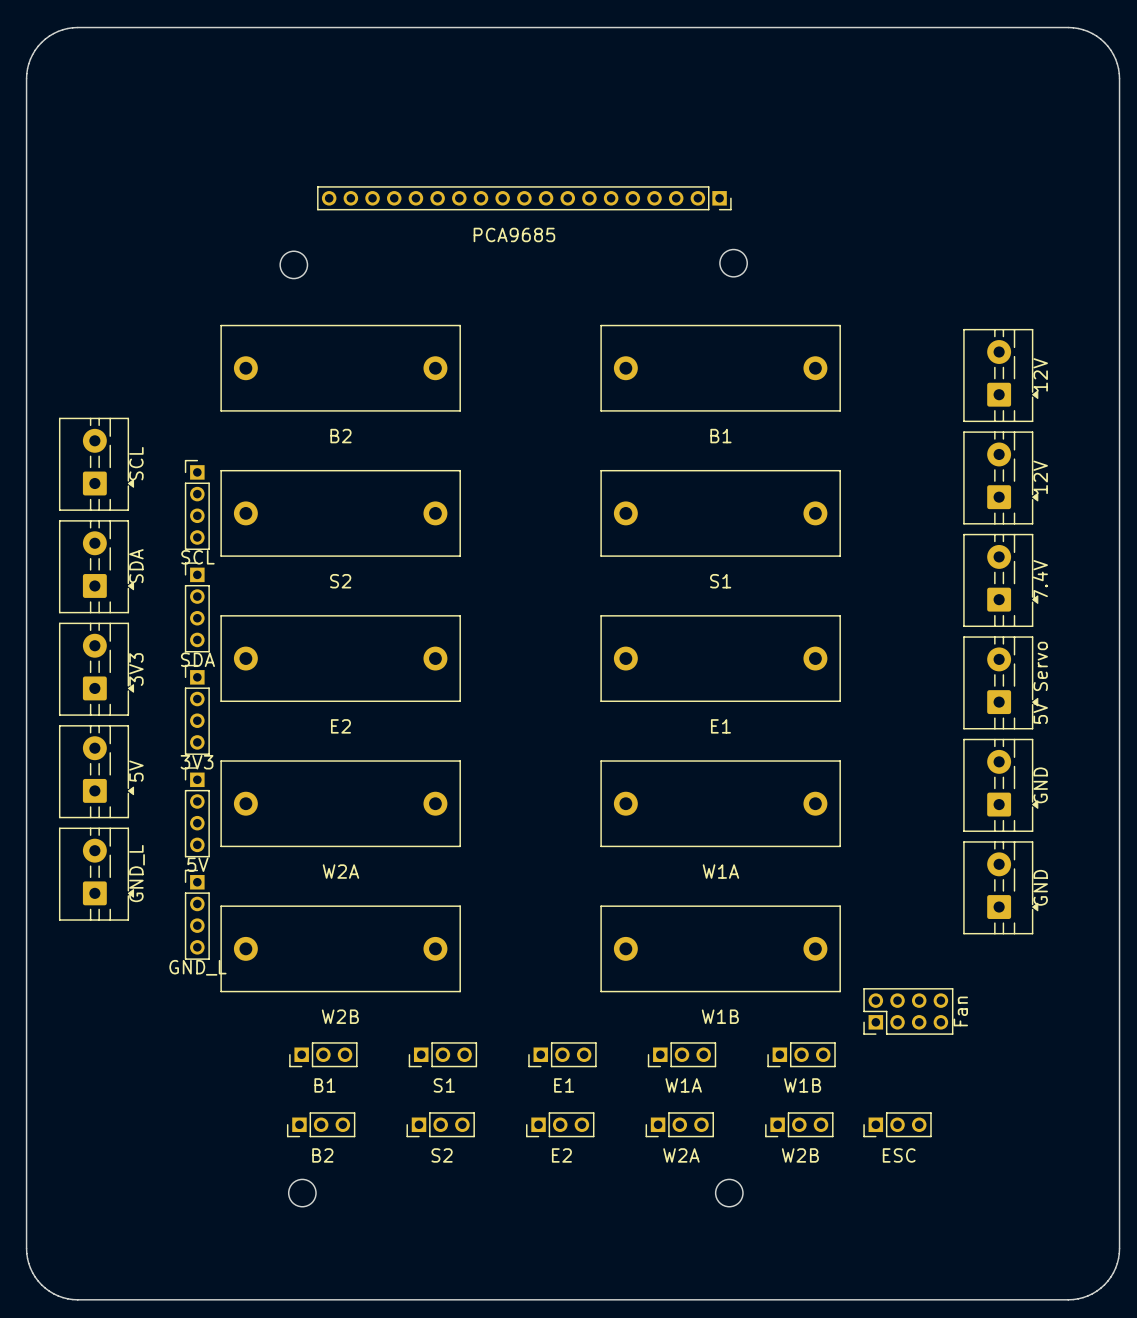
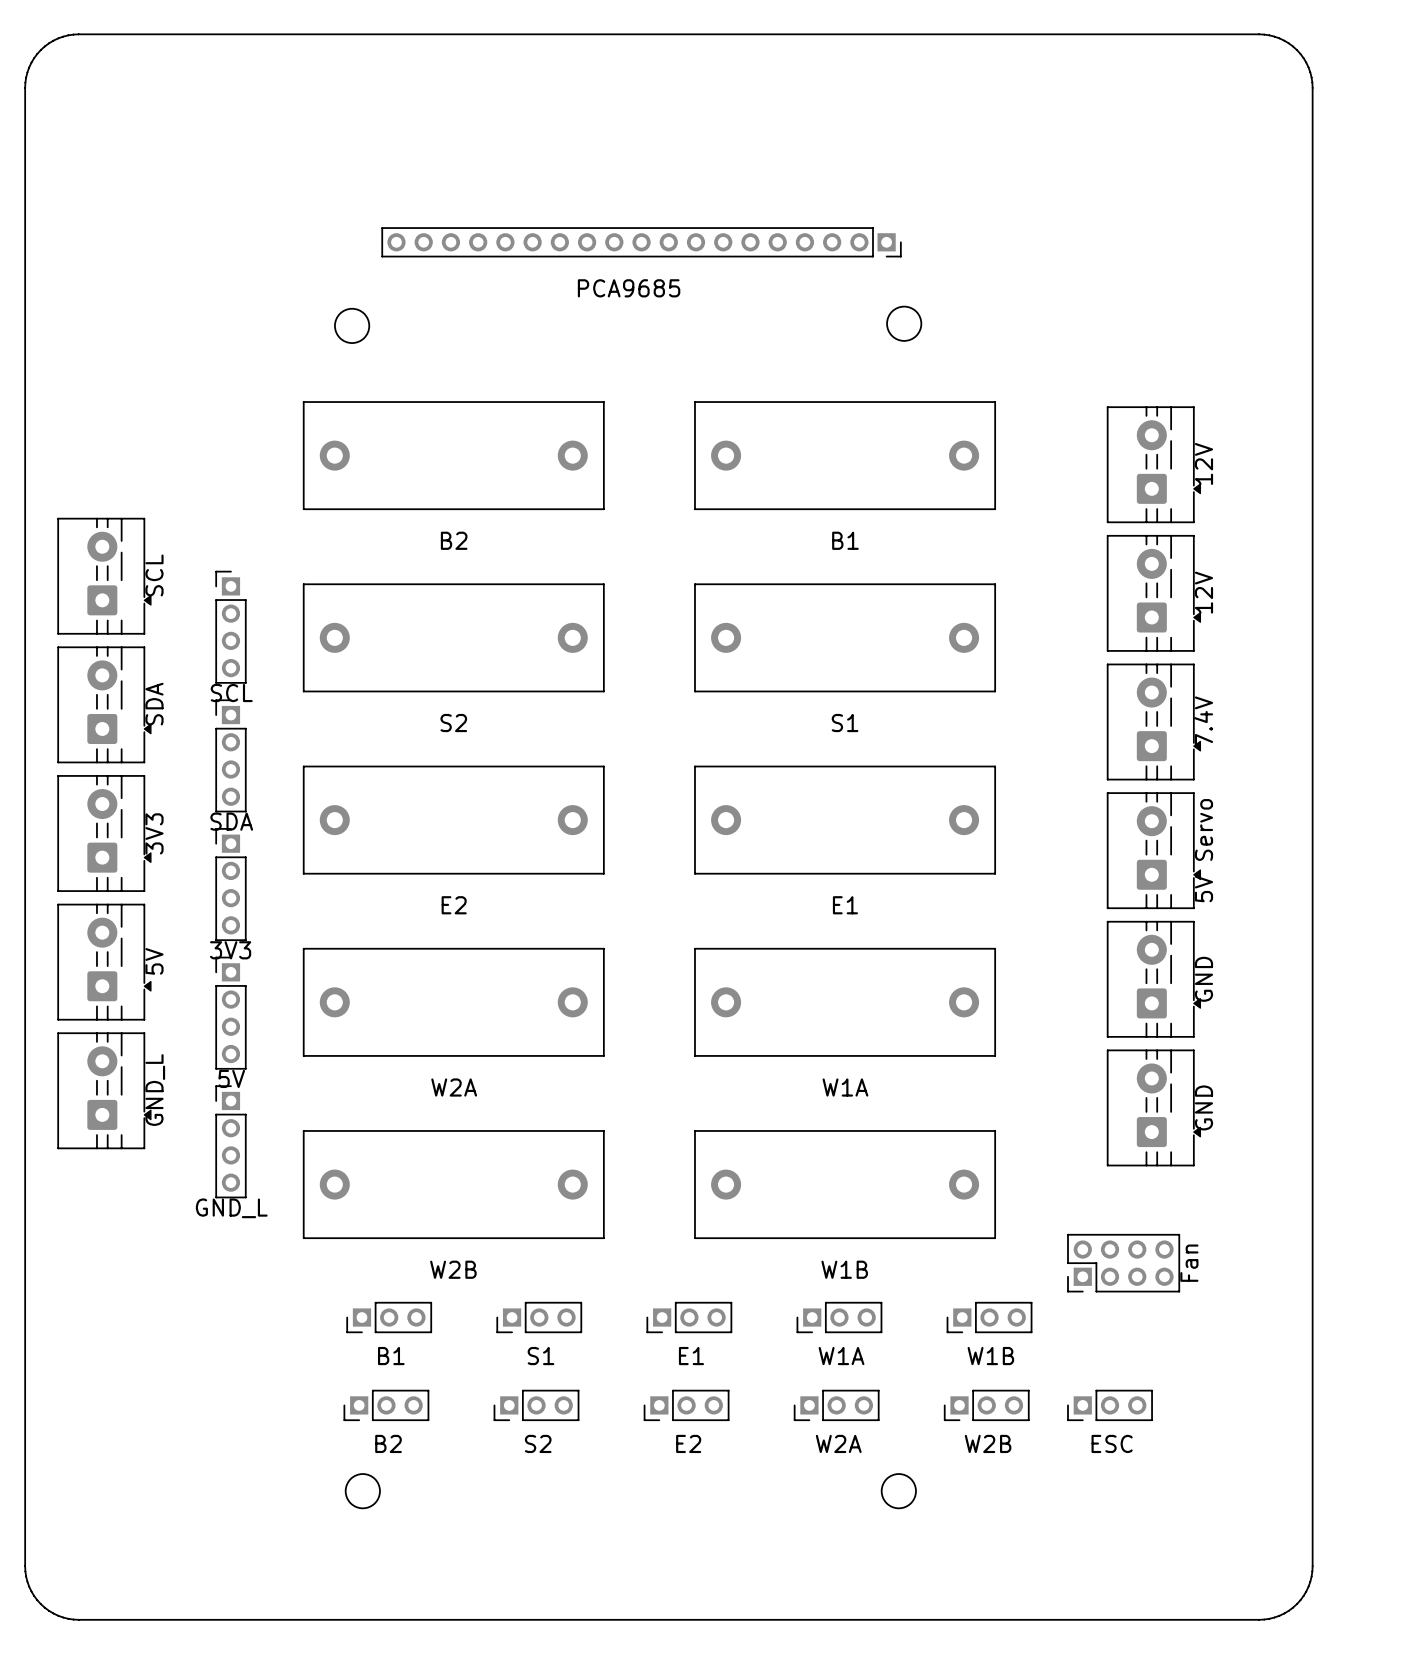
board edge: (77, 27) (58, 31) (41, 42) (30, 59) (26, 78) (26, 1248) (28, 1263) (38, 1281) (58, 1295) (77, 1299) (1068, 1299) (1083, 1297) (1100, 1288) (1115, 1268) (1119, 1248) (1119, 78) (1117, 63) (1107, 46) (1087, 31) (1068, 27) (77, 27) -> (78, 34) (58, 38) (40, 50) (29, 67) (25, 87) (25, 1566) (29, 1586) (37, 1600) (53, 1613) (68, 1618) (78, 1619) (1259, 1619) (1279, 1615) (1293, 1607) (1306, 1591) (1311, 1576) (1312, 1566) (1312, 87) (1308, 67) (1300, 53) (1284, 40) (1269, 35) (1259, 34) (78, 34)
part position: (340, 368) -> (453, 455)
part position: (720, 368) -> (845, 455)
part: none -> 12V (1154, 464)
part: 12V (1000, 375) -> none
part: none -> 12V (1154, 593)
part: 12V (1000, 477) -> none
part position: (340, 513) -> (453, 637)
part position: (720, 513) -> (845, 637)
part position: (1000, 580) -> (1154, 722)
part position: (340, 658) -> (453, 820)
part position: (720, 658) -> (845, 820)
part position: (1000, 682) -> (1154, 850)
part: none -> GND (1154, 979)
part: GND (1000, 785) -> none
part position: (340, 803) -> (453, 1002)
part position: (720, 803) -> (845, 1002)
part: none -> GND (1154, 1107)
part: GND (1000, 887) -> none
part position: (340, 948) -> (453, 1184)
part position: (720, 948) -> (845, 1184)

